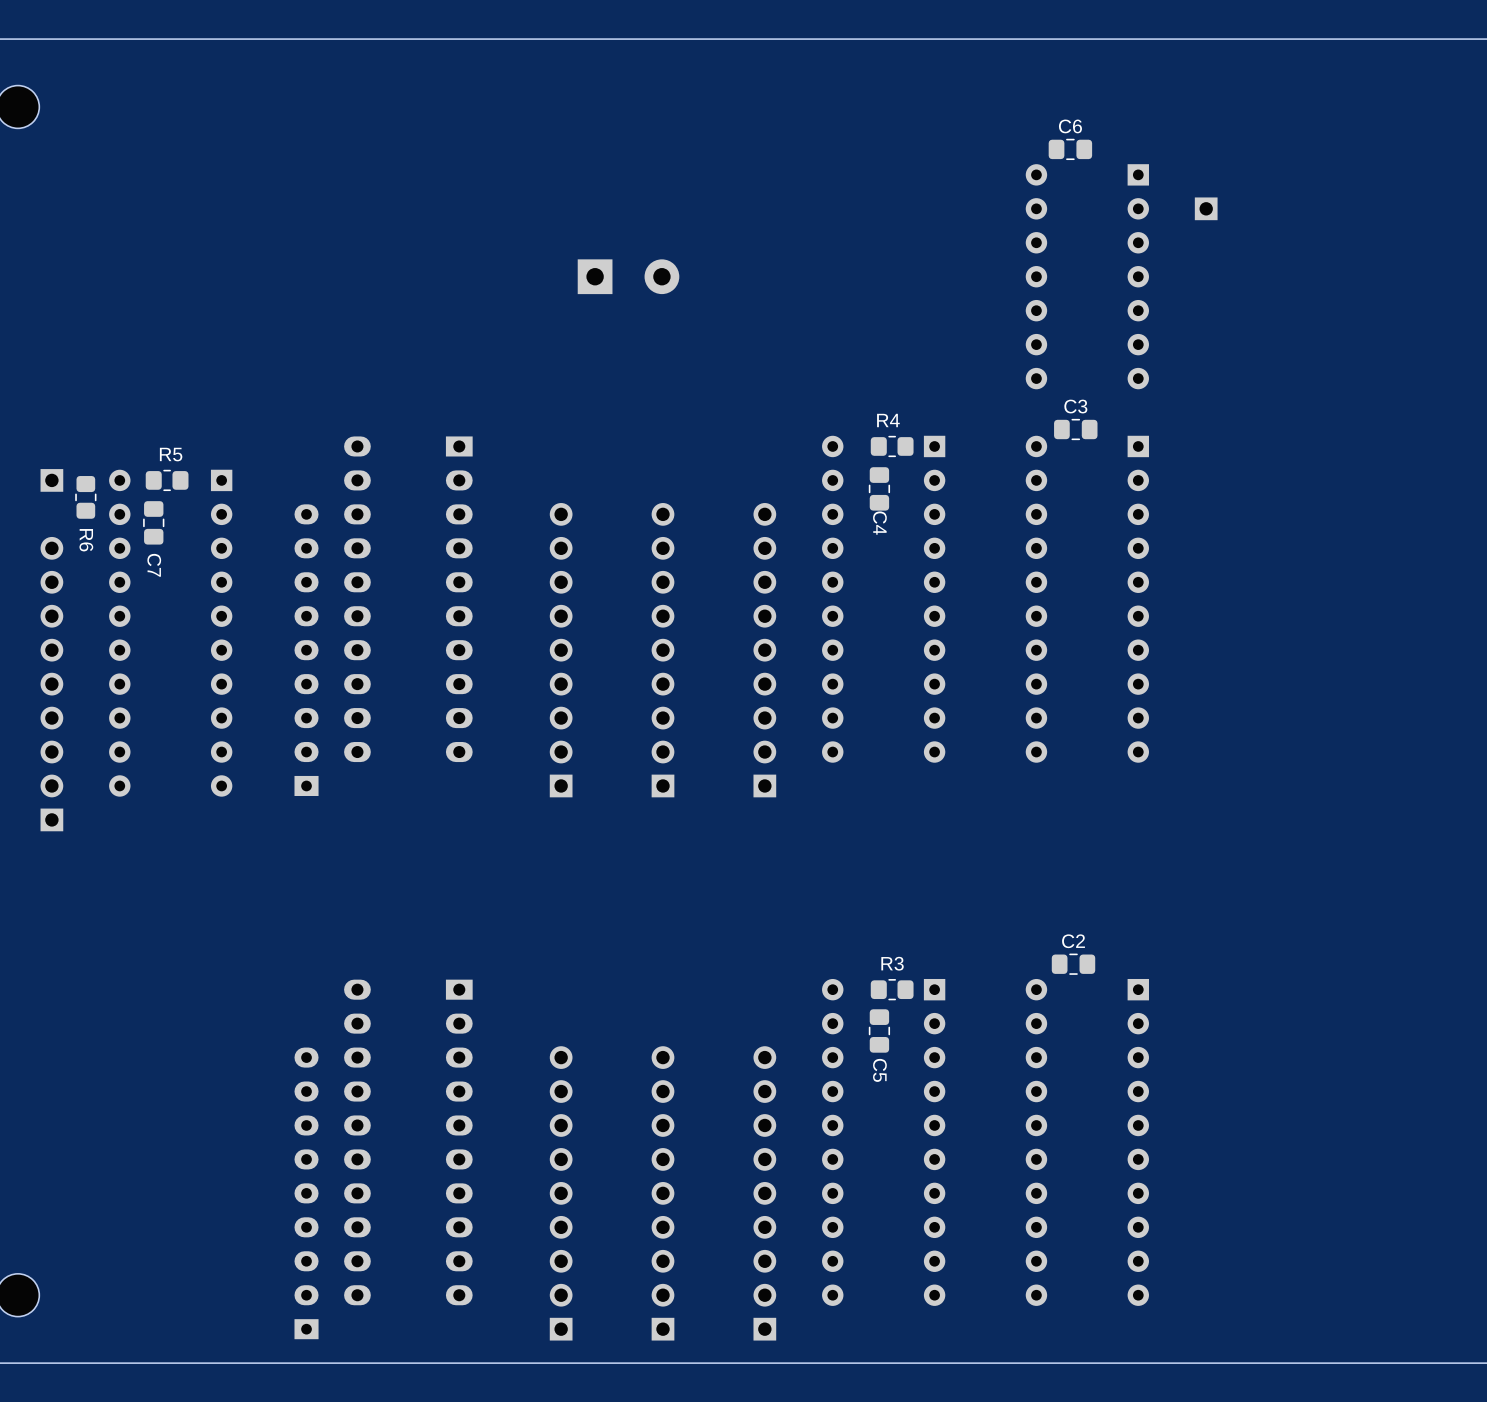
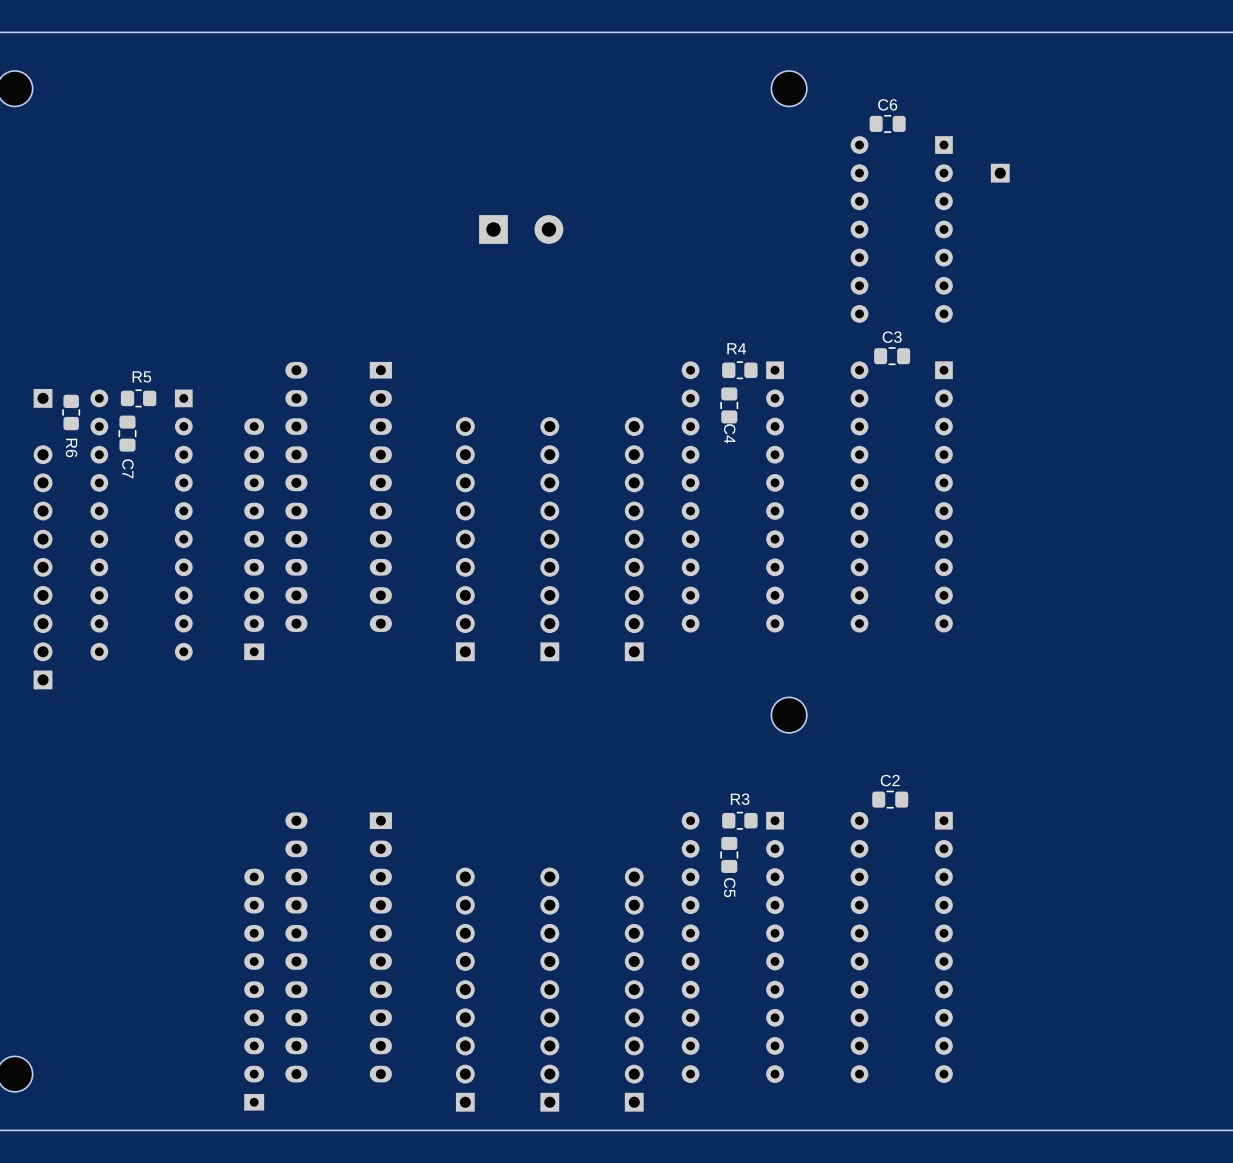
part: none -> (789, 88)
part: none -> (789, 715)

